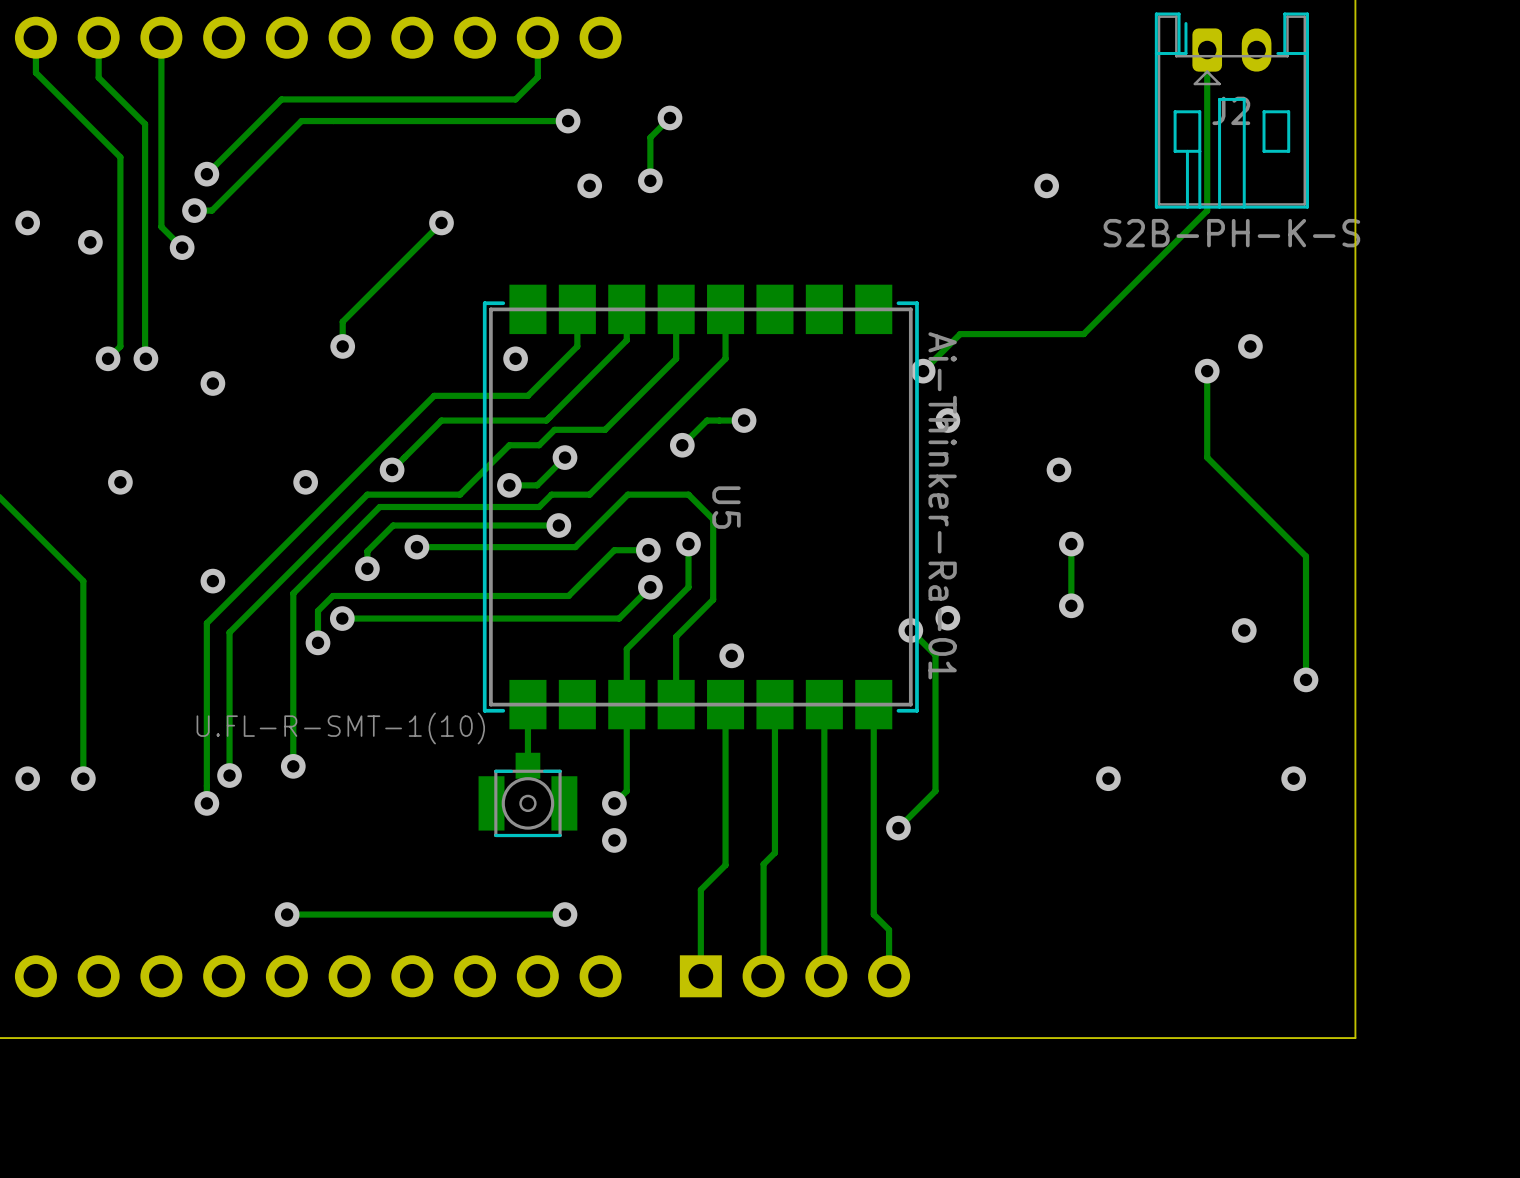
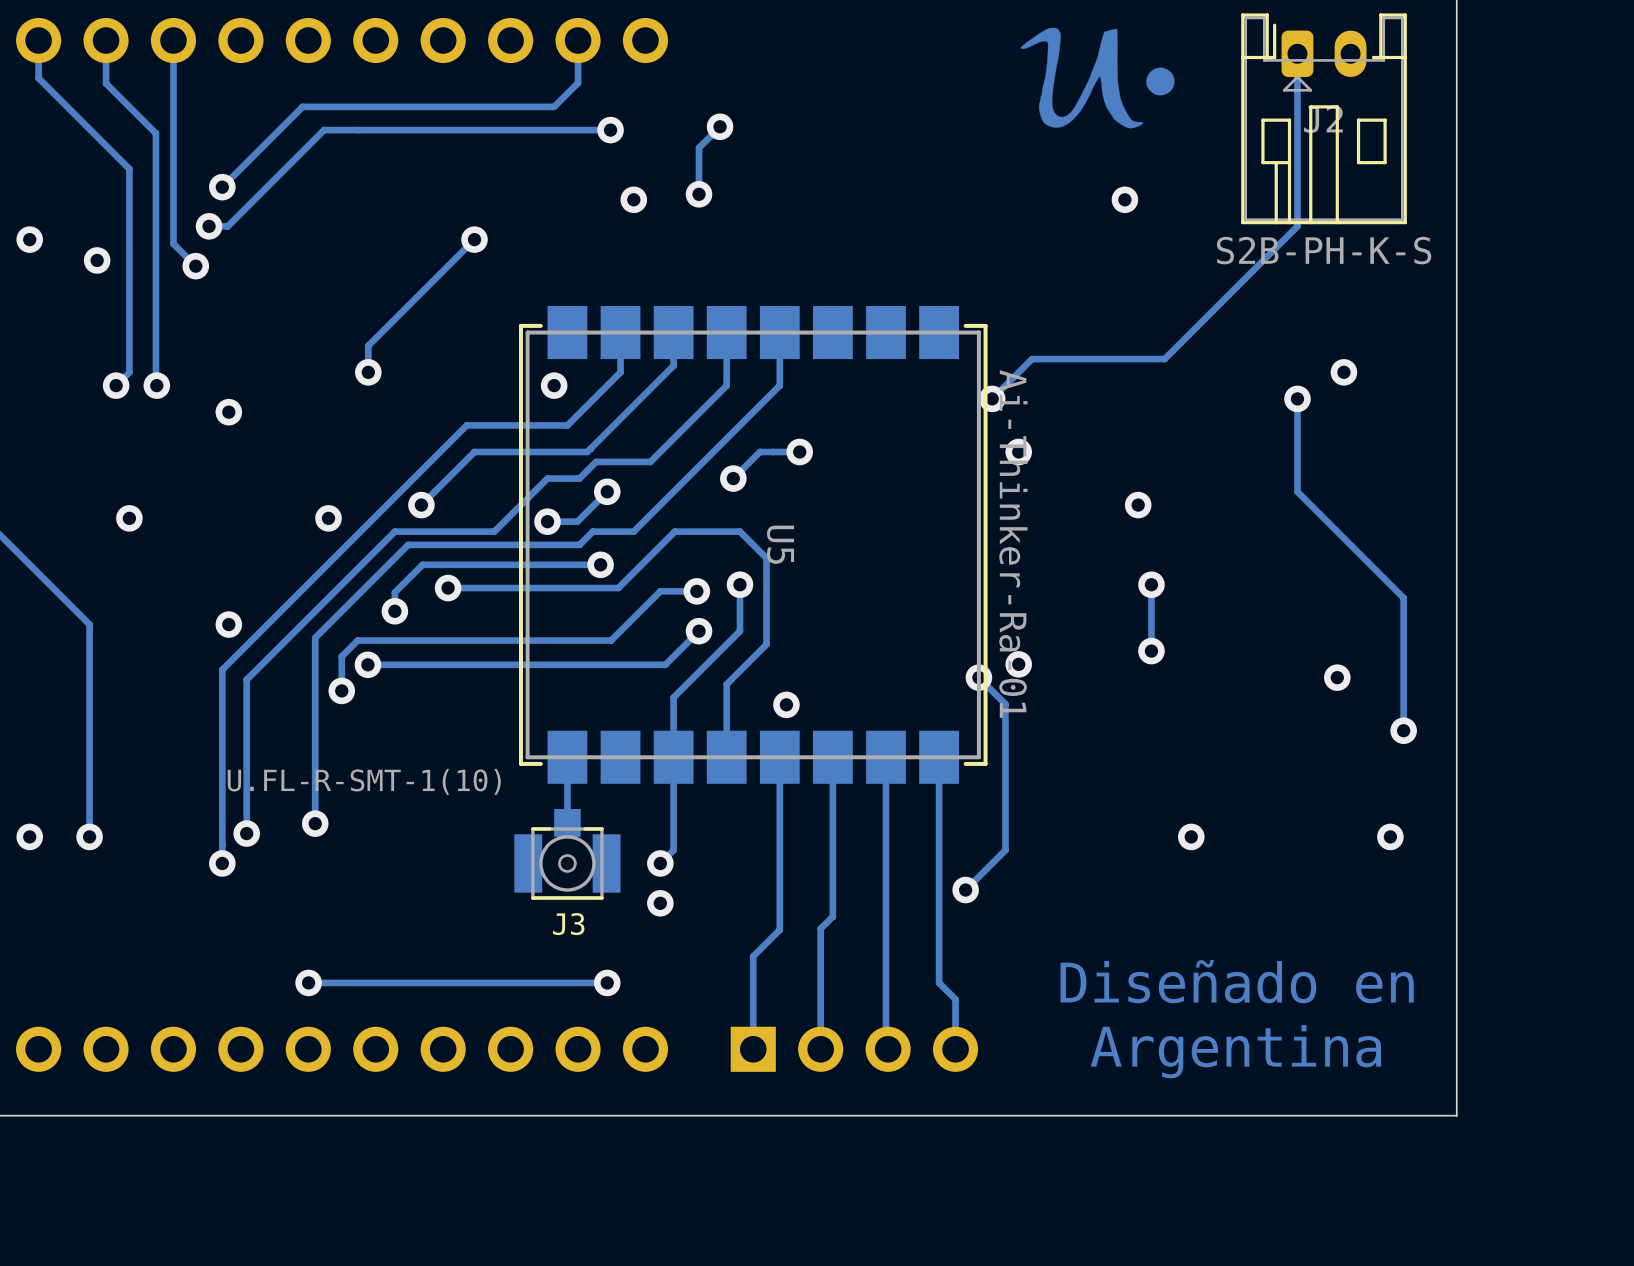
drawing: none -> [1020, 27, 1175, 129]
J3 name: none -> J3 (568, 924)
text: none -> Diseñado en (1237, 981)
text: none -> Argentina (1235, 1051)

